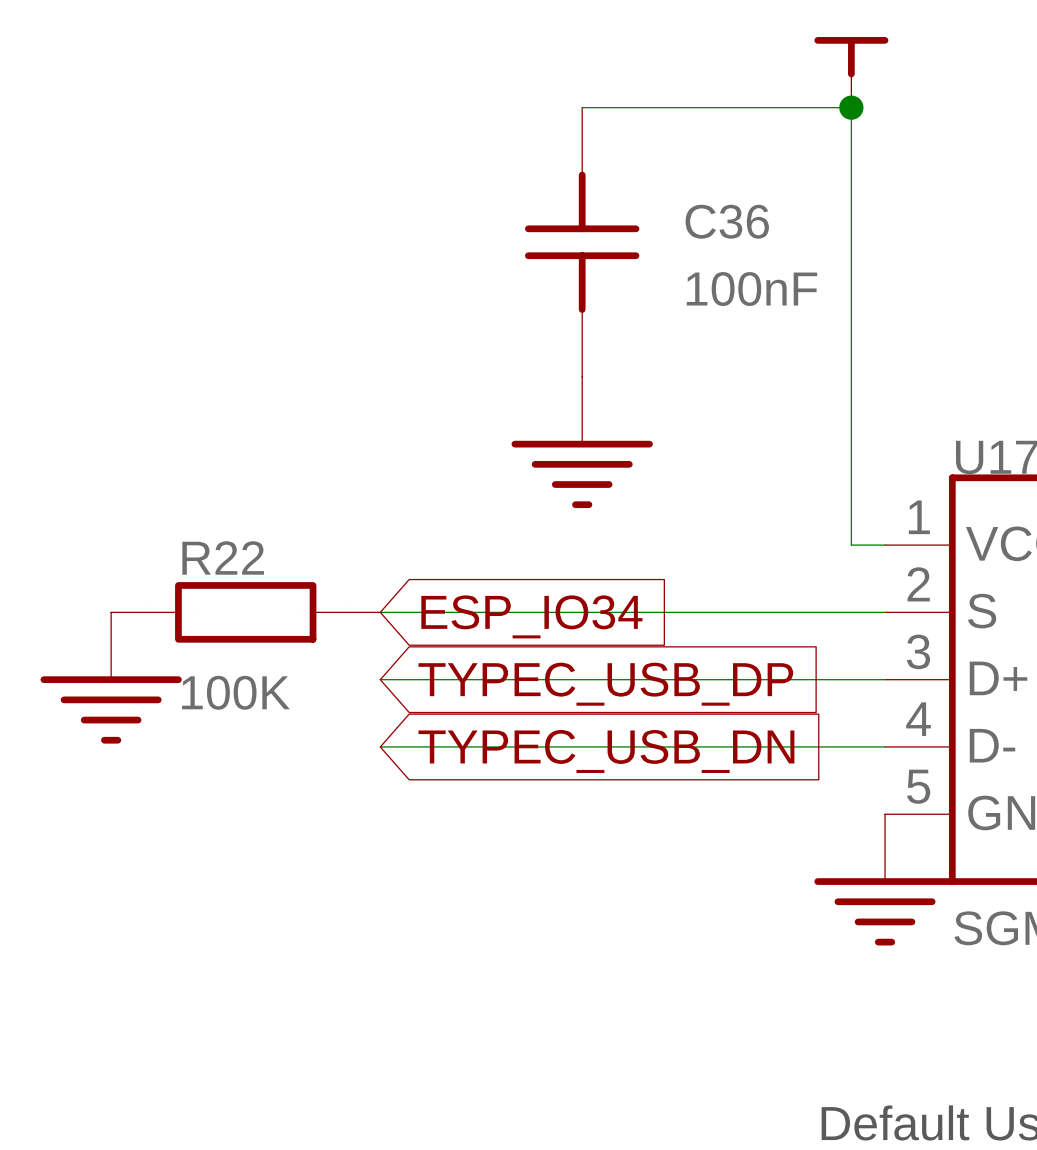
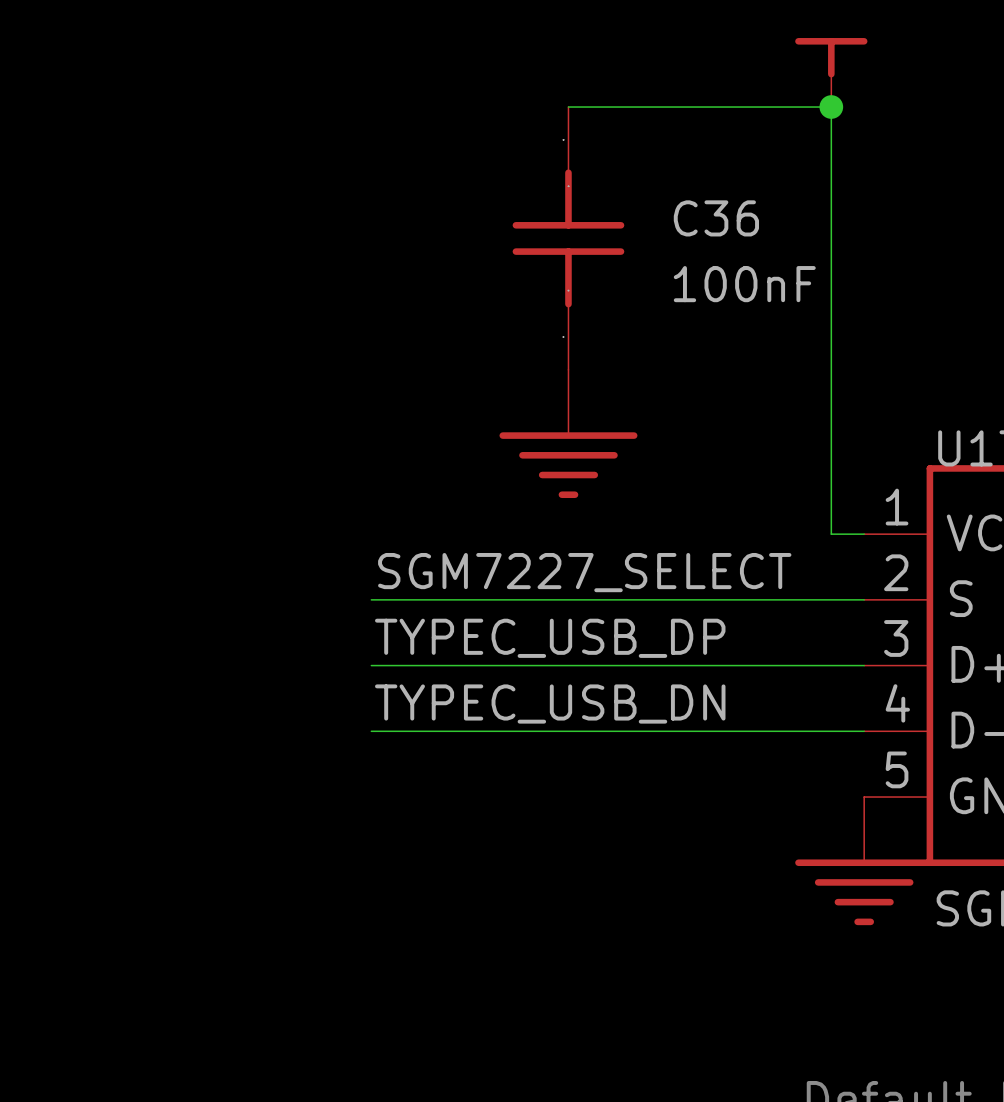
label: none -> SGM7227_SELECT (584, 572)
R22: 100K (245, 612) -> none
global label: ESP_IO34 (531, 616) -> none
label: none -> TYPEC_USB_DP (550, 638)
power symbol: (111, 677) -> none
global label: TYPEC_USB_DP (605, 684) -> none
label: none -> TYPEC_USB_DN (550, 704)
global label: TYPEC_USB_DN (606, 751) -> none

